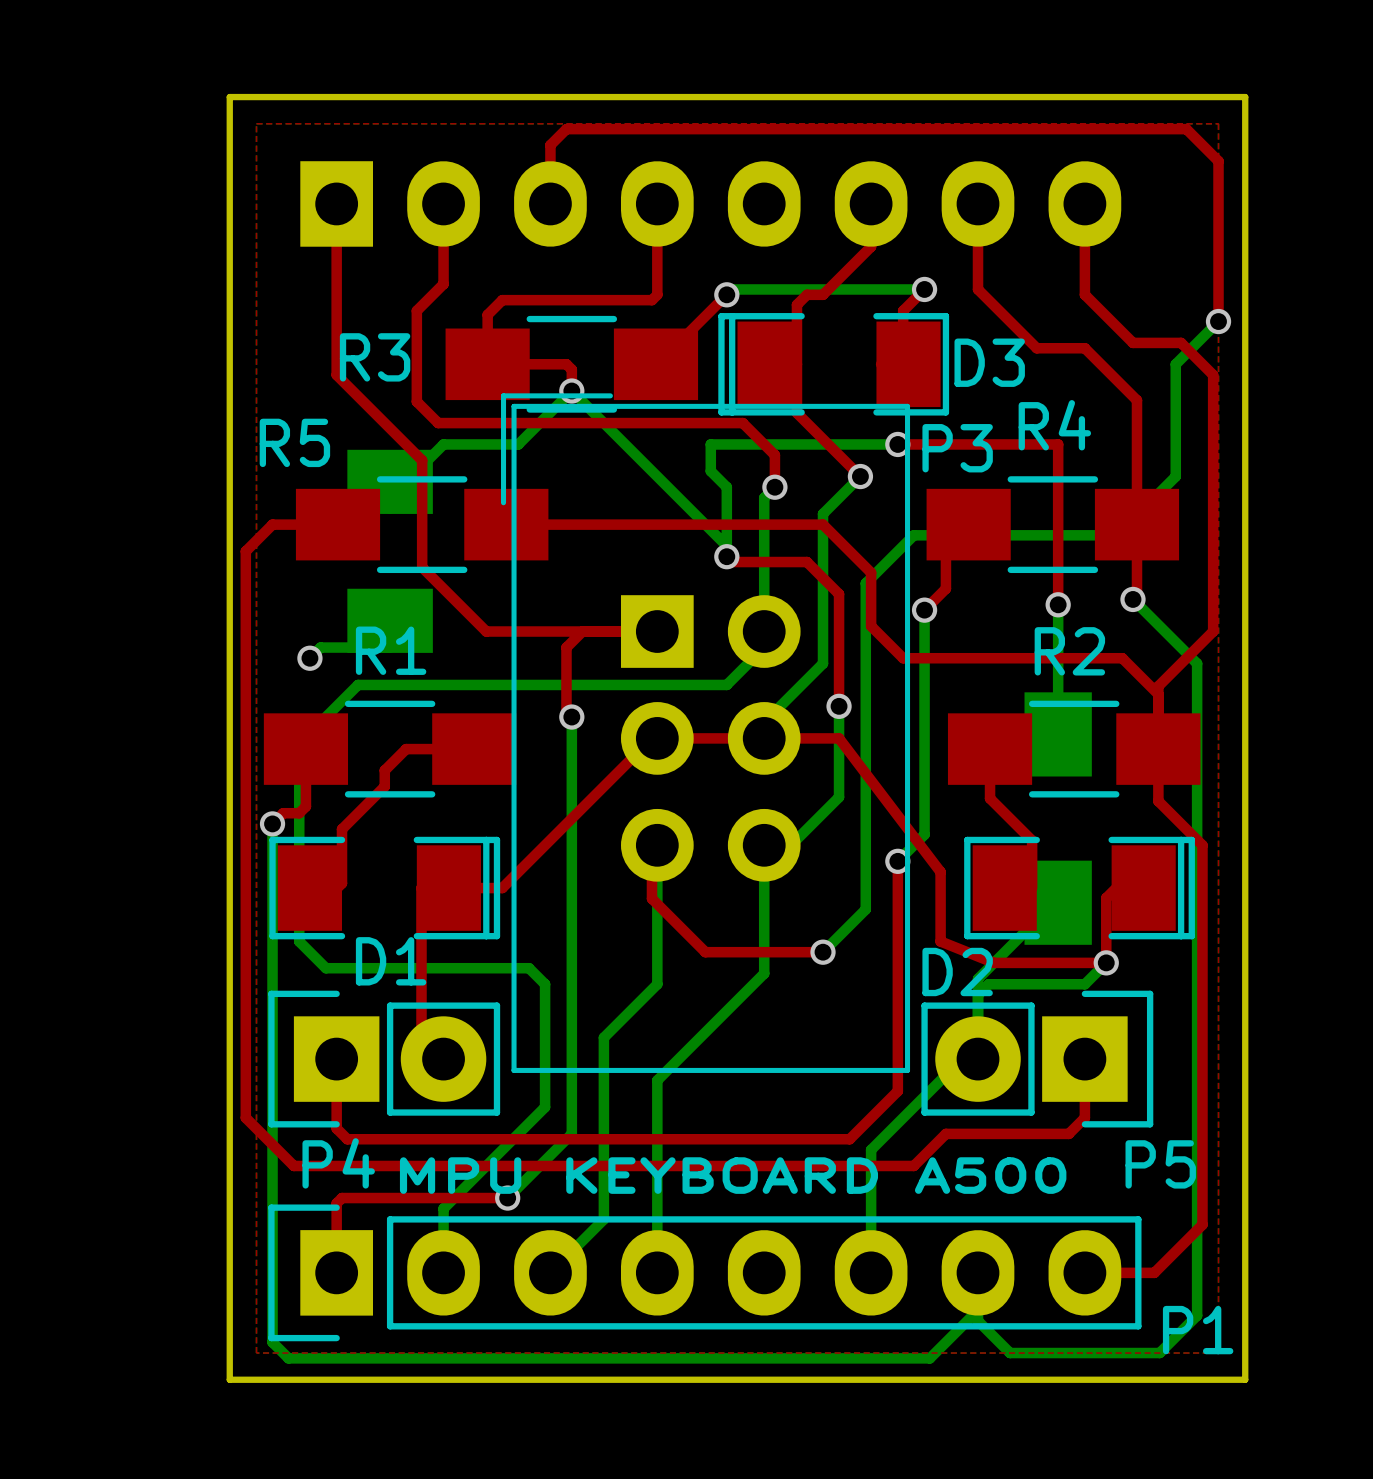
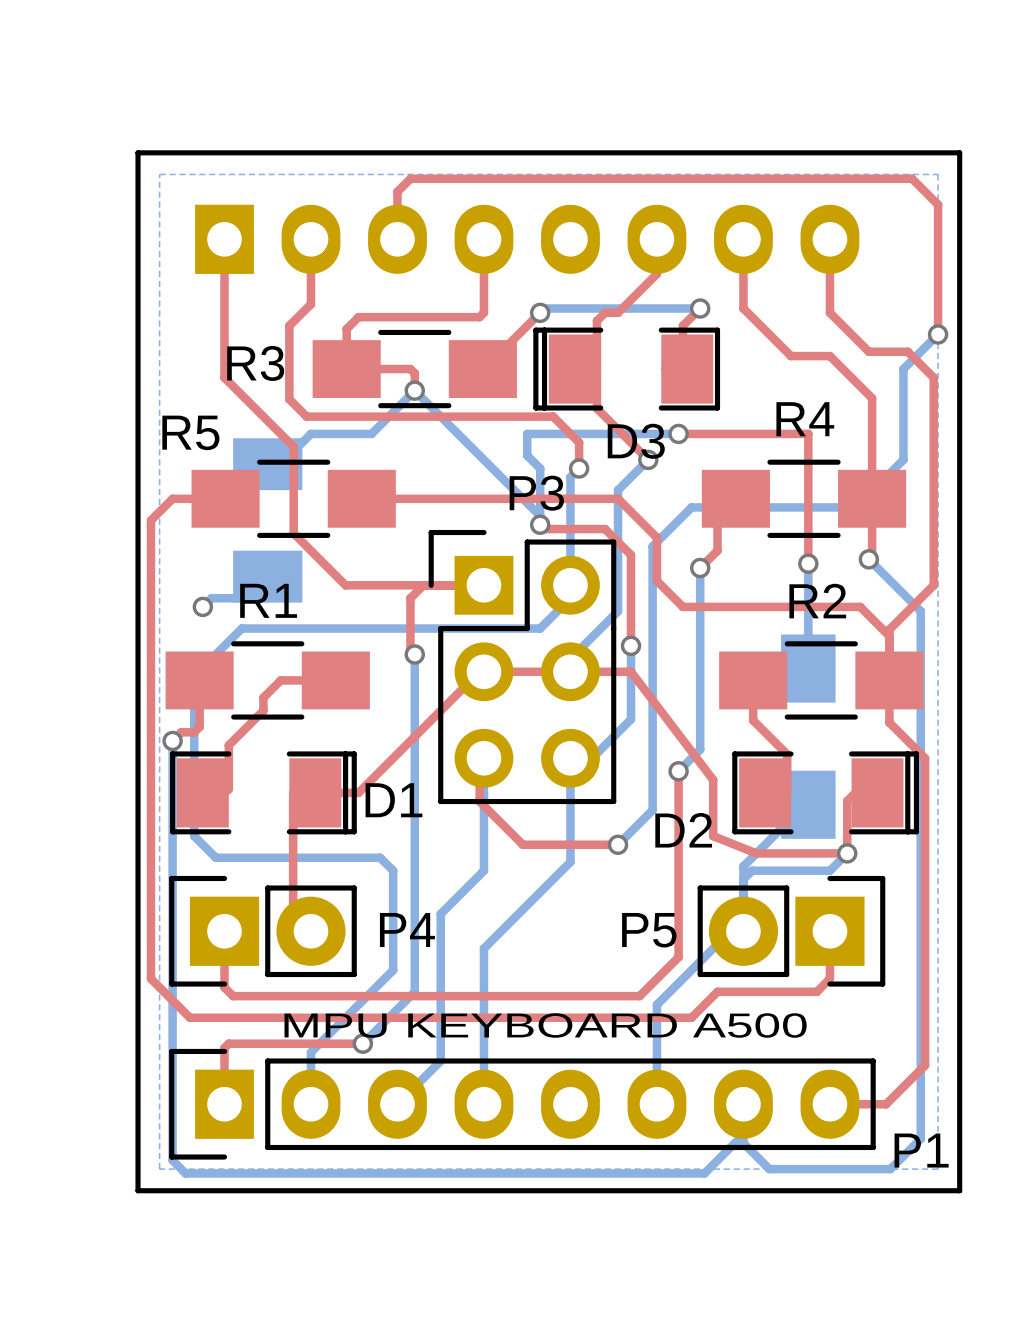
top zone outline: (256, 123) (256, 1353) (1218, 1353) (1218, 123) (256, 123) -> none
D3 name position: D3 (989, 362) -> D3 (636, 441)
P3 footprint: [500, 393, 911, 1073] -> [428, 529, 617, 805]
P3 name position: P3 (957, 448) -> P3 (536, 493)
D1 name position: D1 (391, 961) -> D1 (393, 800)
D2 name position: D2 (957, 972) -> D2 (683, 830)
P4 name position: P4 (338, 1163) -> P4 (407, 929)
P5 name position: P5 (1160, 1164) -> P5 (649, 930)

